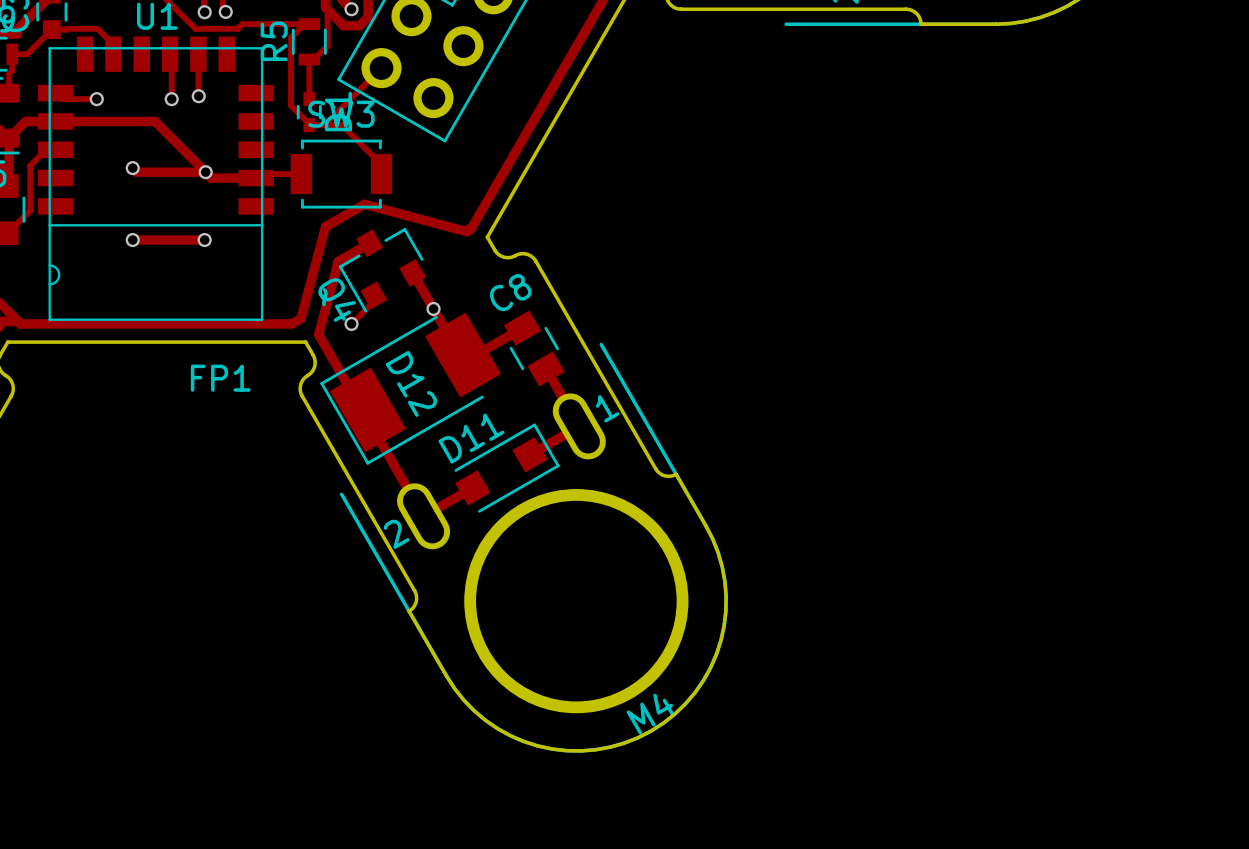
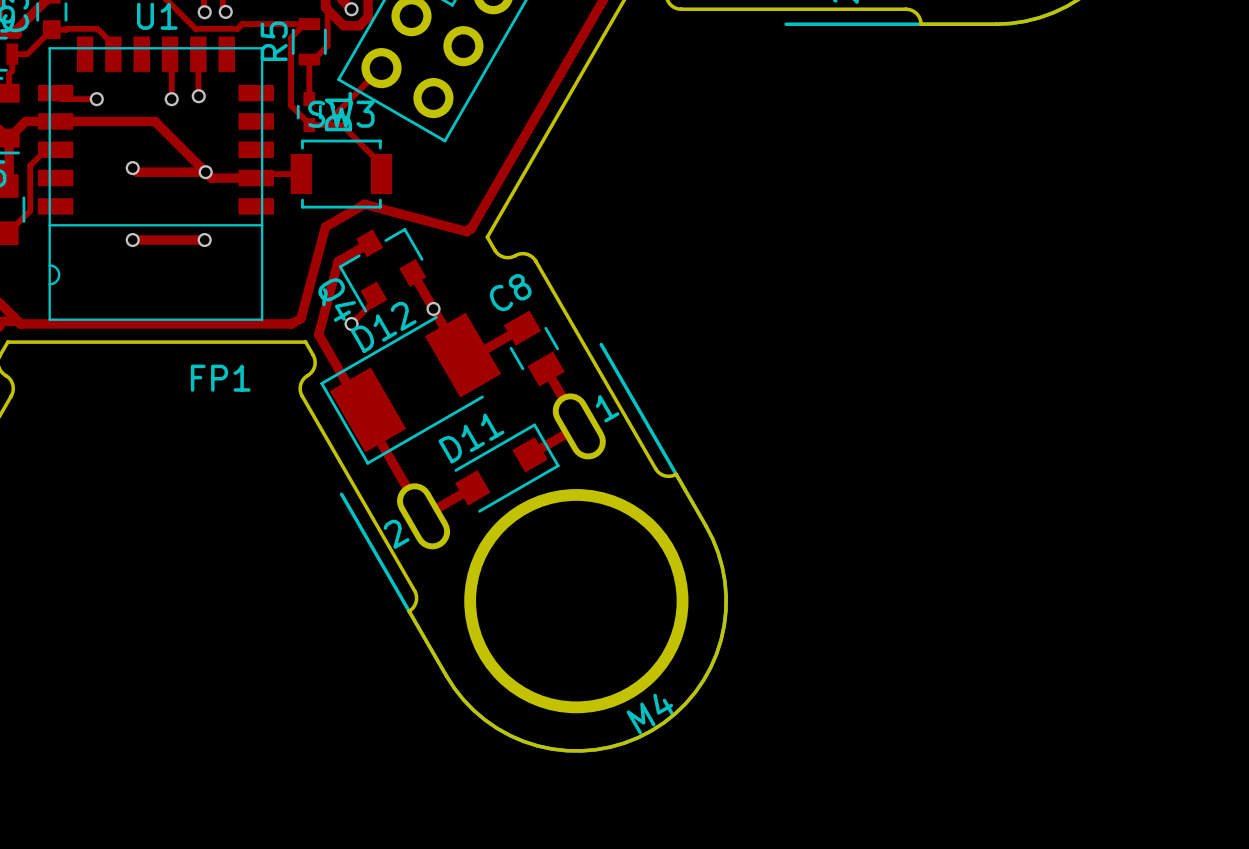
D12 name rotation: 0° (411, 383) -> 90° counterclockwise (383, 327)

